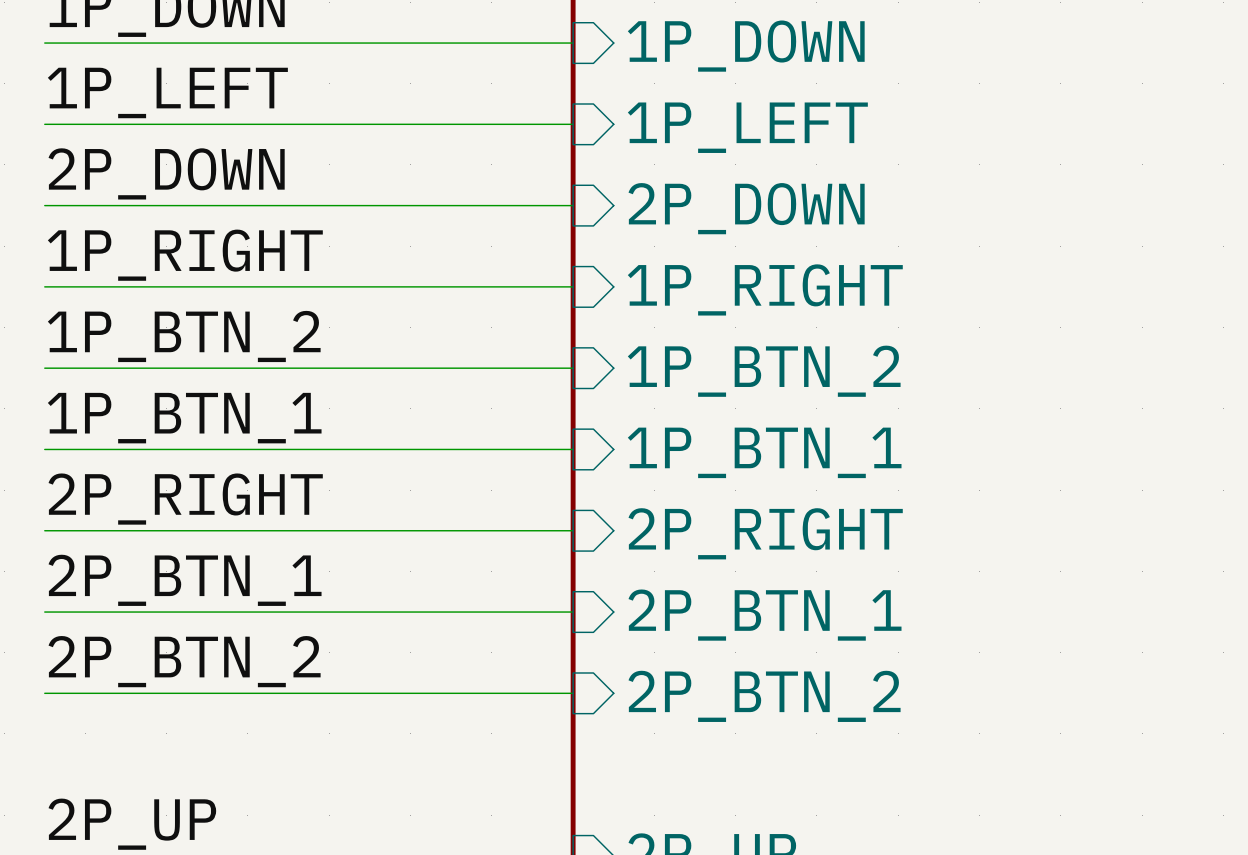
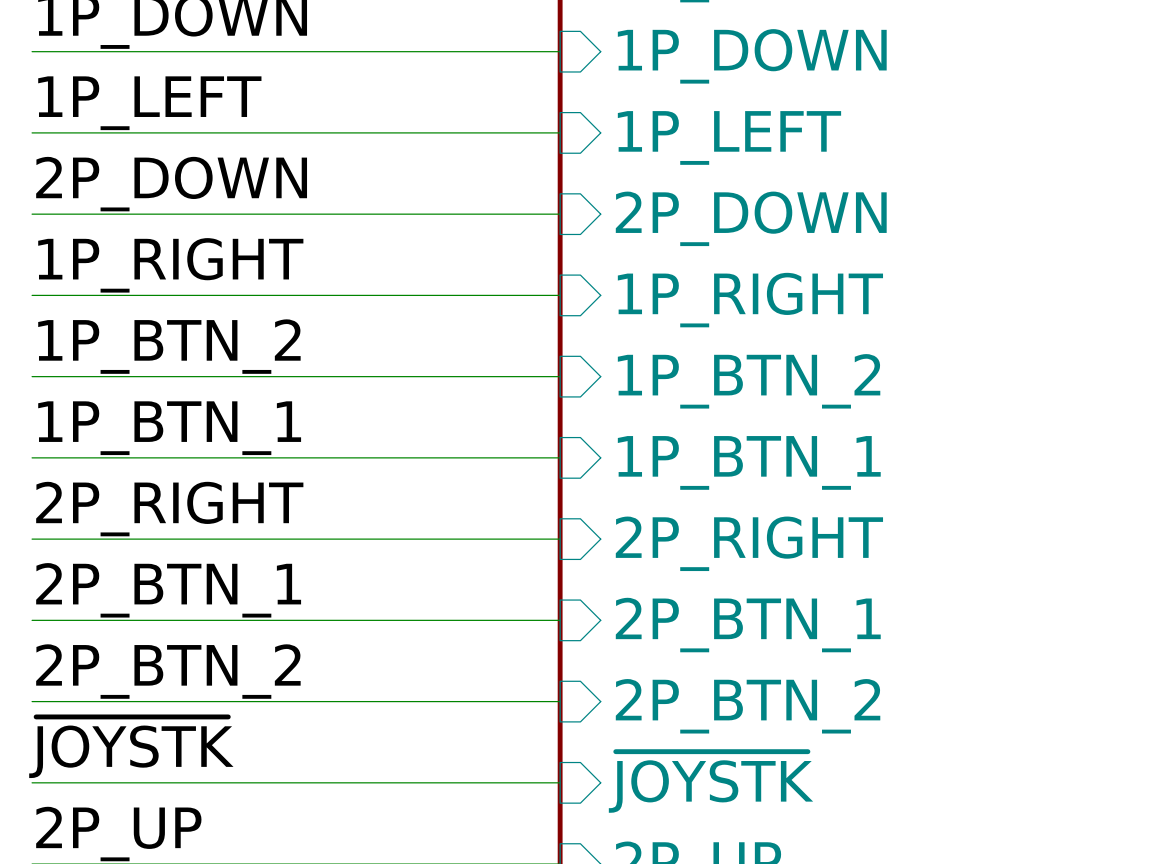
label: none -> ~{JOYSTK} (131, 747)
sheet pin: none -> ~{JOYSTK} (710, 782)
wire: none -> (32, 782) (560, 782)

